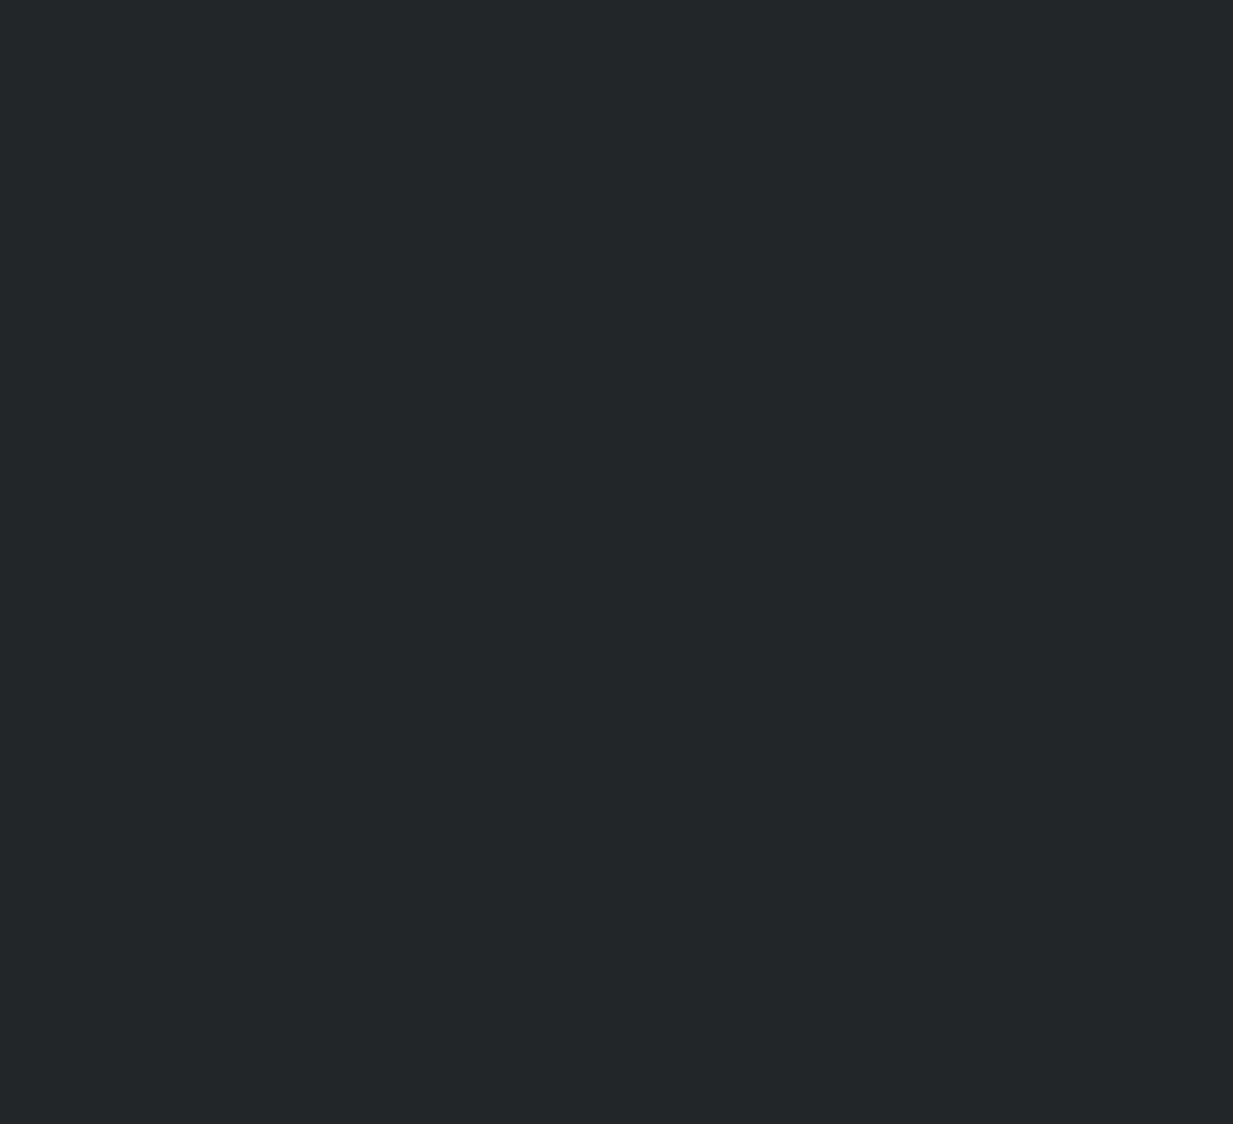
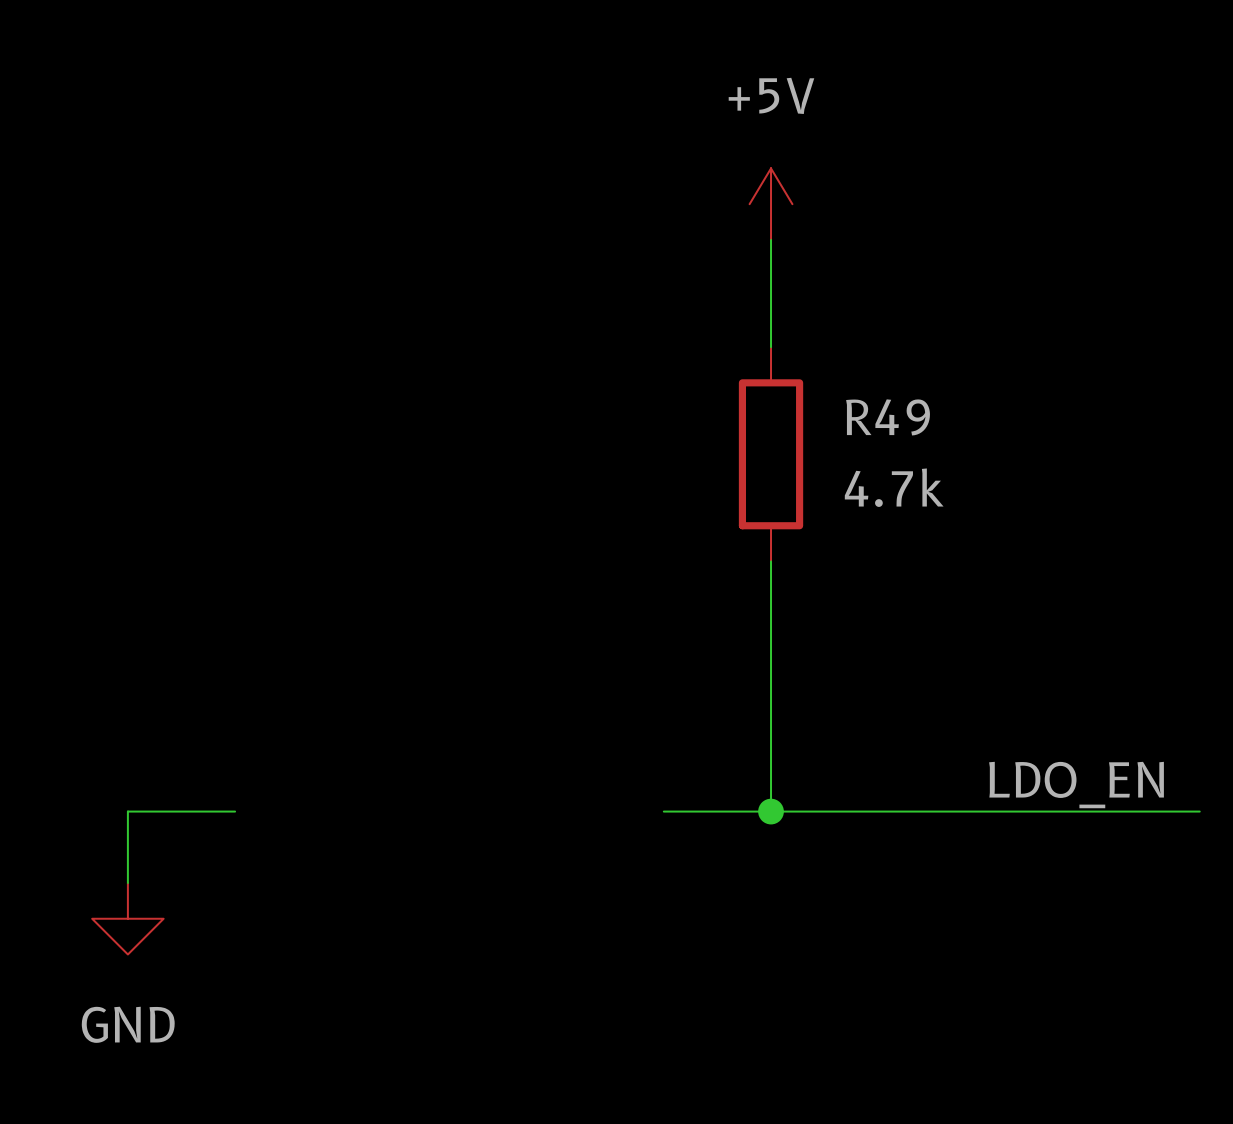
power symbol: none -> +5V (771, 204)
wire: none -> (771, 239) (771, 347)
R49: none -> 4.7k (771, 454)
wire: none -> (771, 561) (771, 811)
label: none -> LDO_EN (1076, 785)
wire: none -> (235, 811) (127, 811) (127, 883)
wire: none -> (663, 811) (1199, 811)
junction: none -> (771, 811)
power symbol: none -> GND (127, 918)

